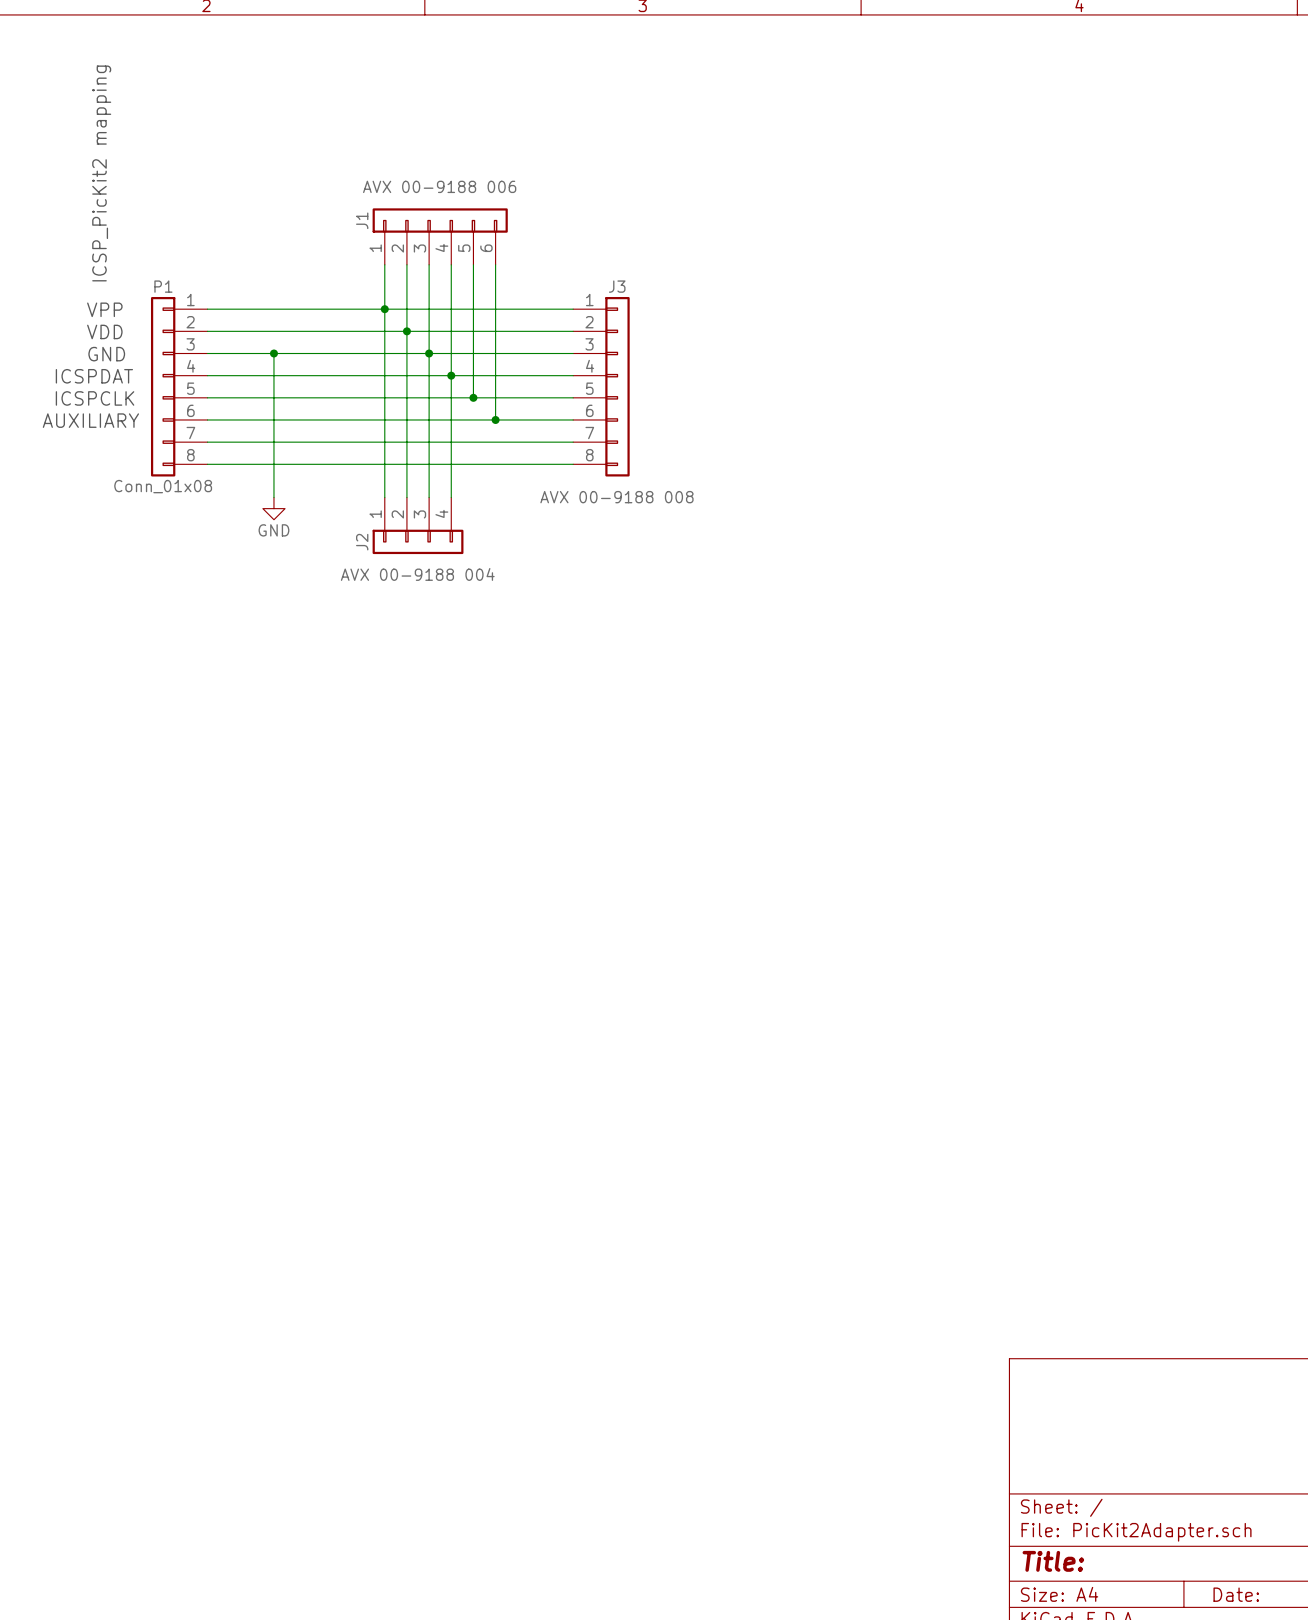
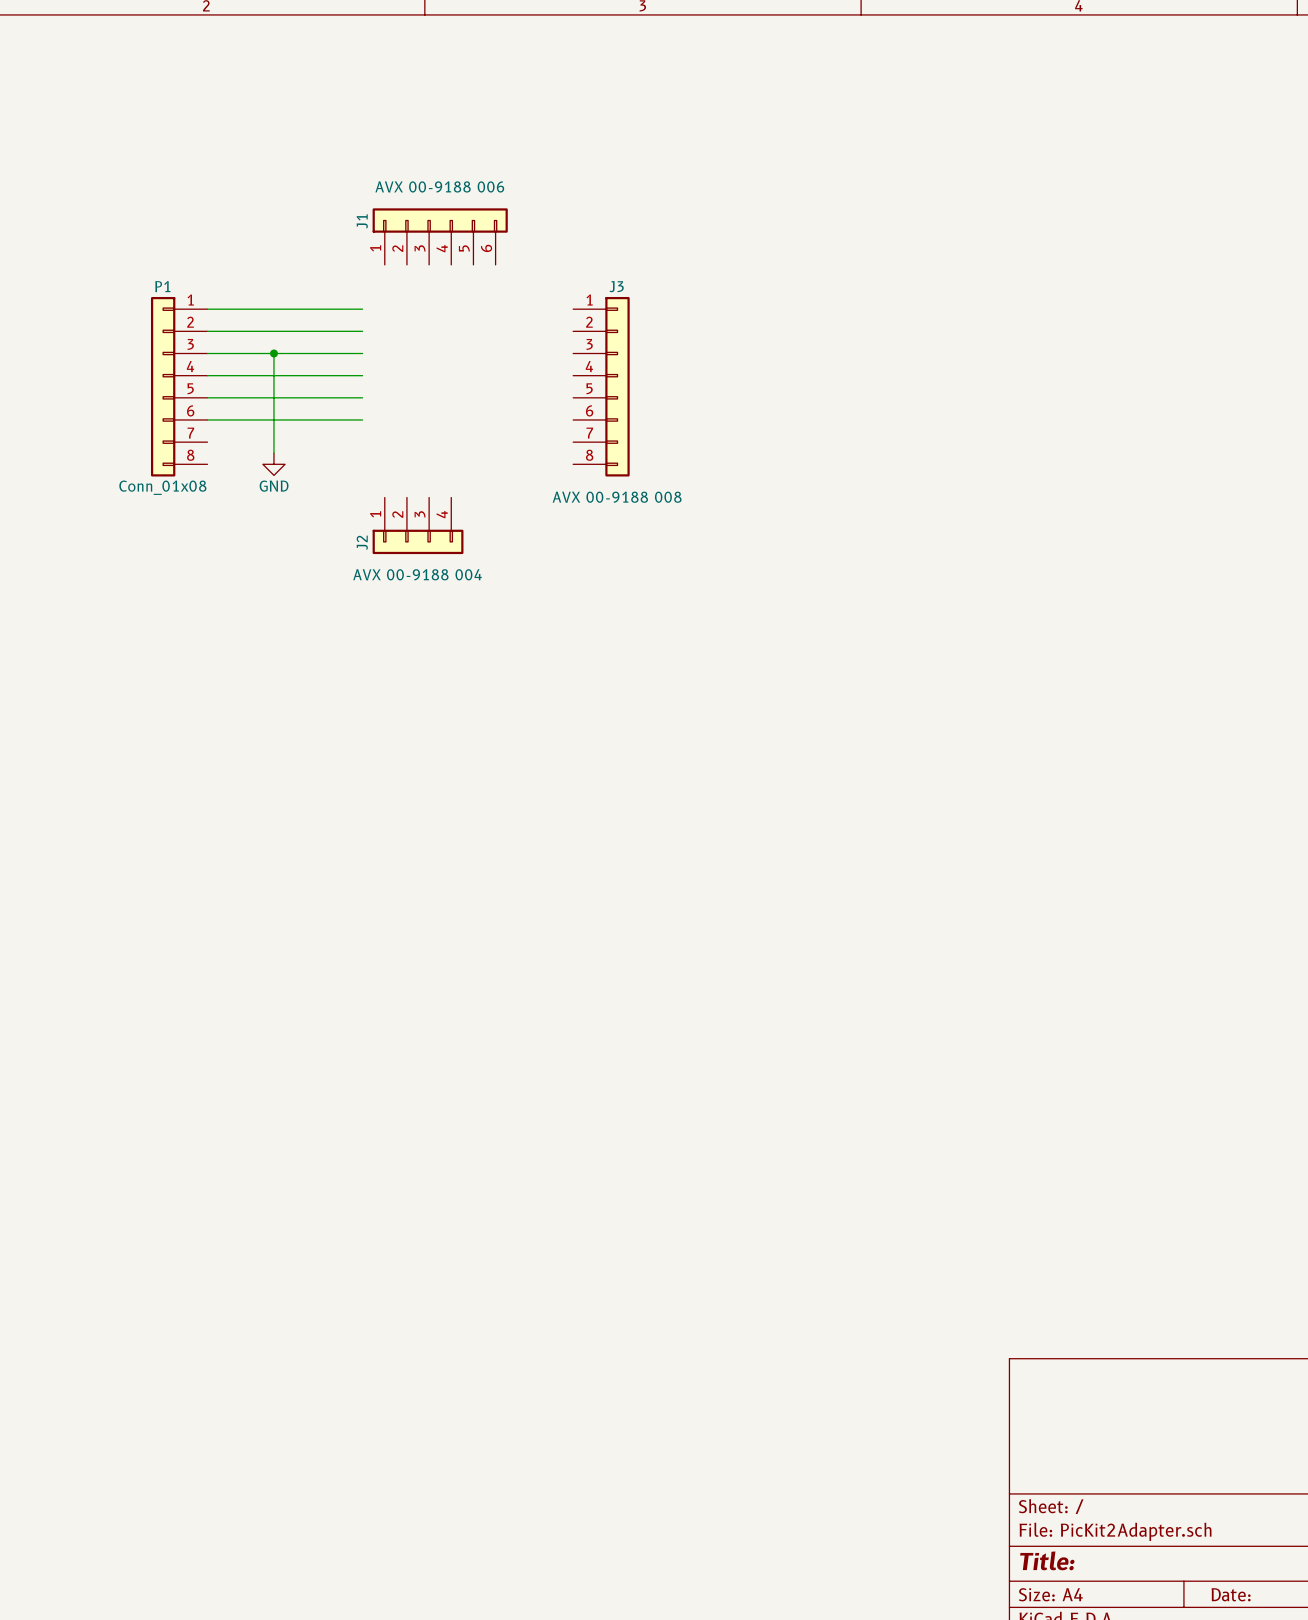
text: ICSP_PicKit2 mapping (101, 173) -> none
wire: (384, 264) (384, 497) -> none
wire: (406, 264) (406, 497) -> none
wire: (429, 264) (429, 497) -> none
wire: (451, 264) (451, 497) -> none
wire: (473, 264) (473, 397) -> none
wire: (495, 264) (495, 419) -> none
text: VPP (104, 309) -> none
wire: (362, 309) (573, 309) -> none
junction: (384, 309) -> none
text: VDD (104, 331) -> none
wire: (362, 331) (573, 331) -> none
junction: (406, 331) -> none
wire: (362, 353) (573, 353) -> none
junction: (429, 353) -> none
text: GND (106, 354) -> none
wire: (362, 375) (573, 375) -> none
junction: (451, 375) -> none
text: ICSPDAT (94, 376) -> none
wire: (362, 397) (573, 397) -> none
junction: (473, 397) -> none
text: ICSPCLK (95, 398) -> none
wire: (362, 419) (573, 419) -> none
junction: (495, 419) -> none
text: AUXILIARY (90, 420) -> none
wire: (207, 442) (573, 442) -> none
wire: (273, 453) (273, 497) -> none
wire: (207, 464) (573, 464) -> none
power symbol position: GND (273, 508) -> GND (273, 464)

